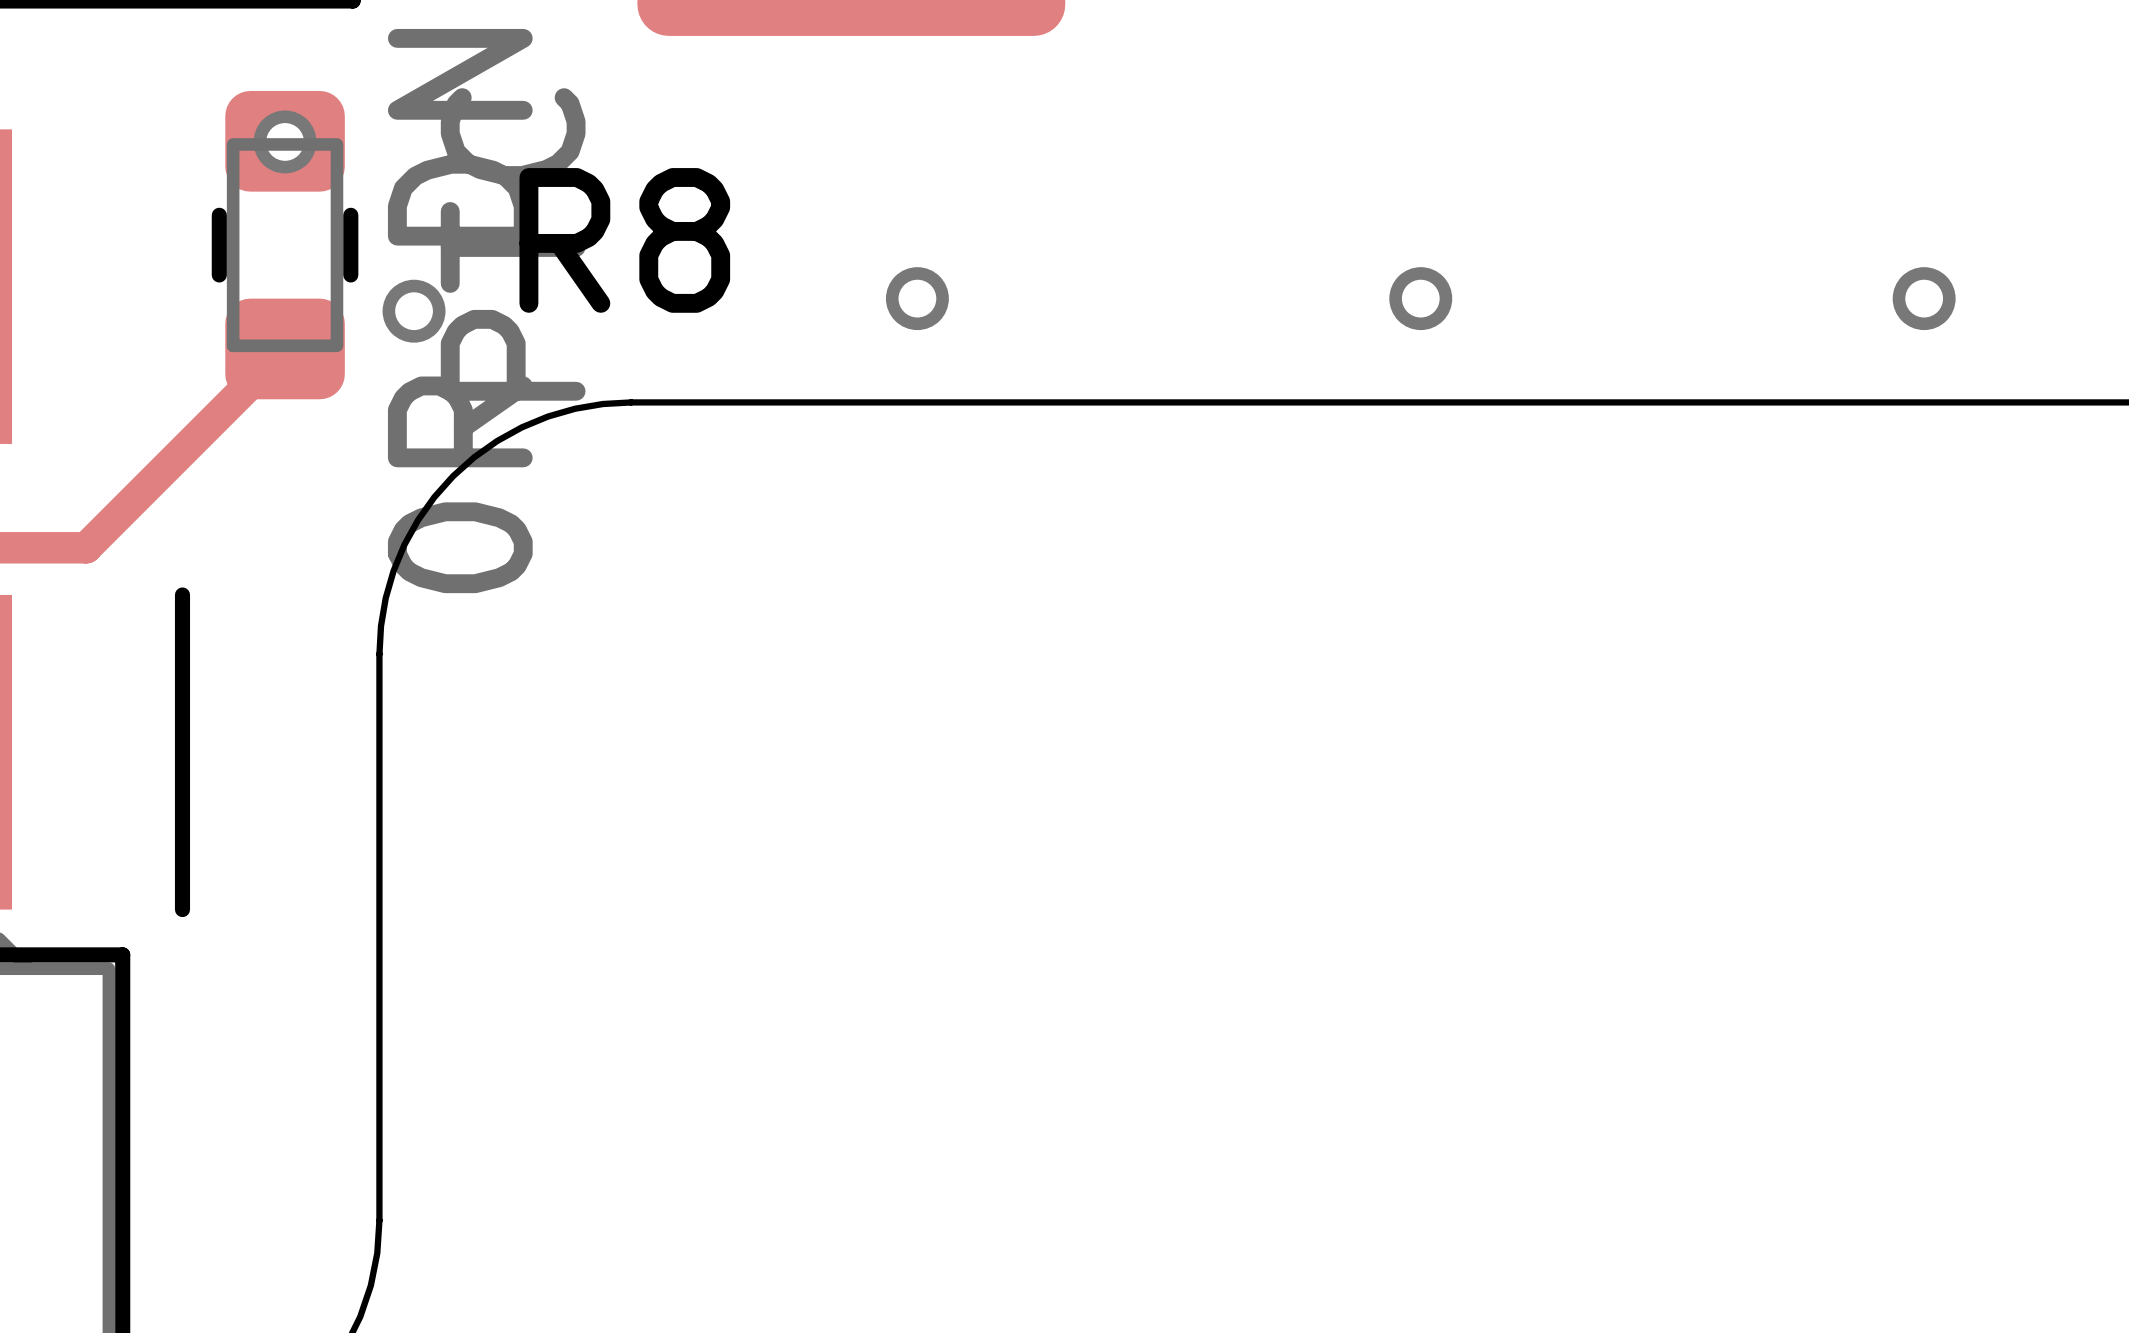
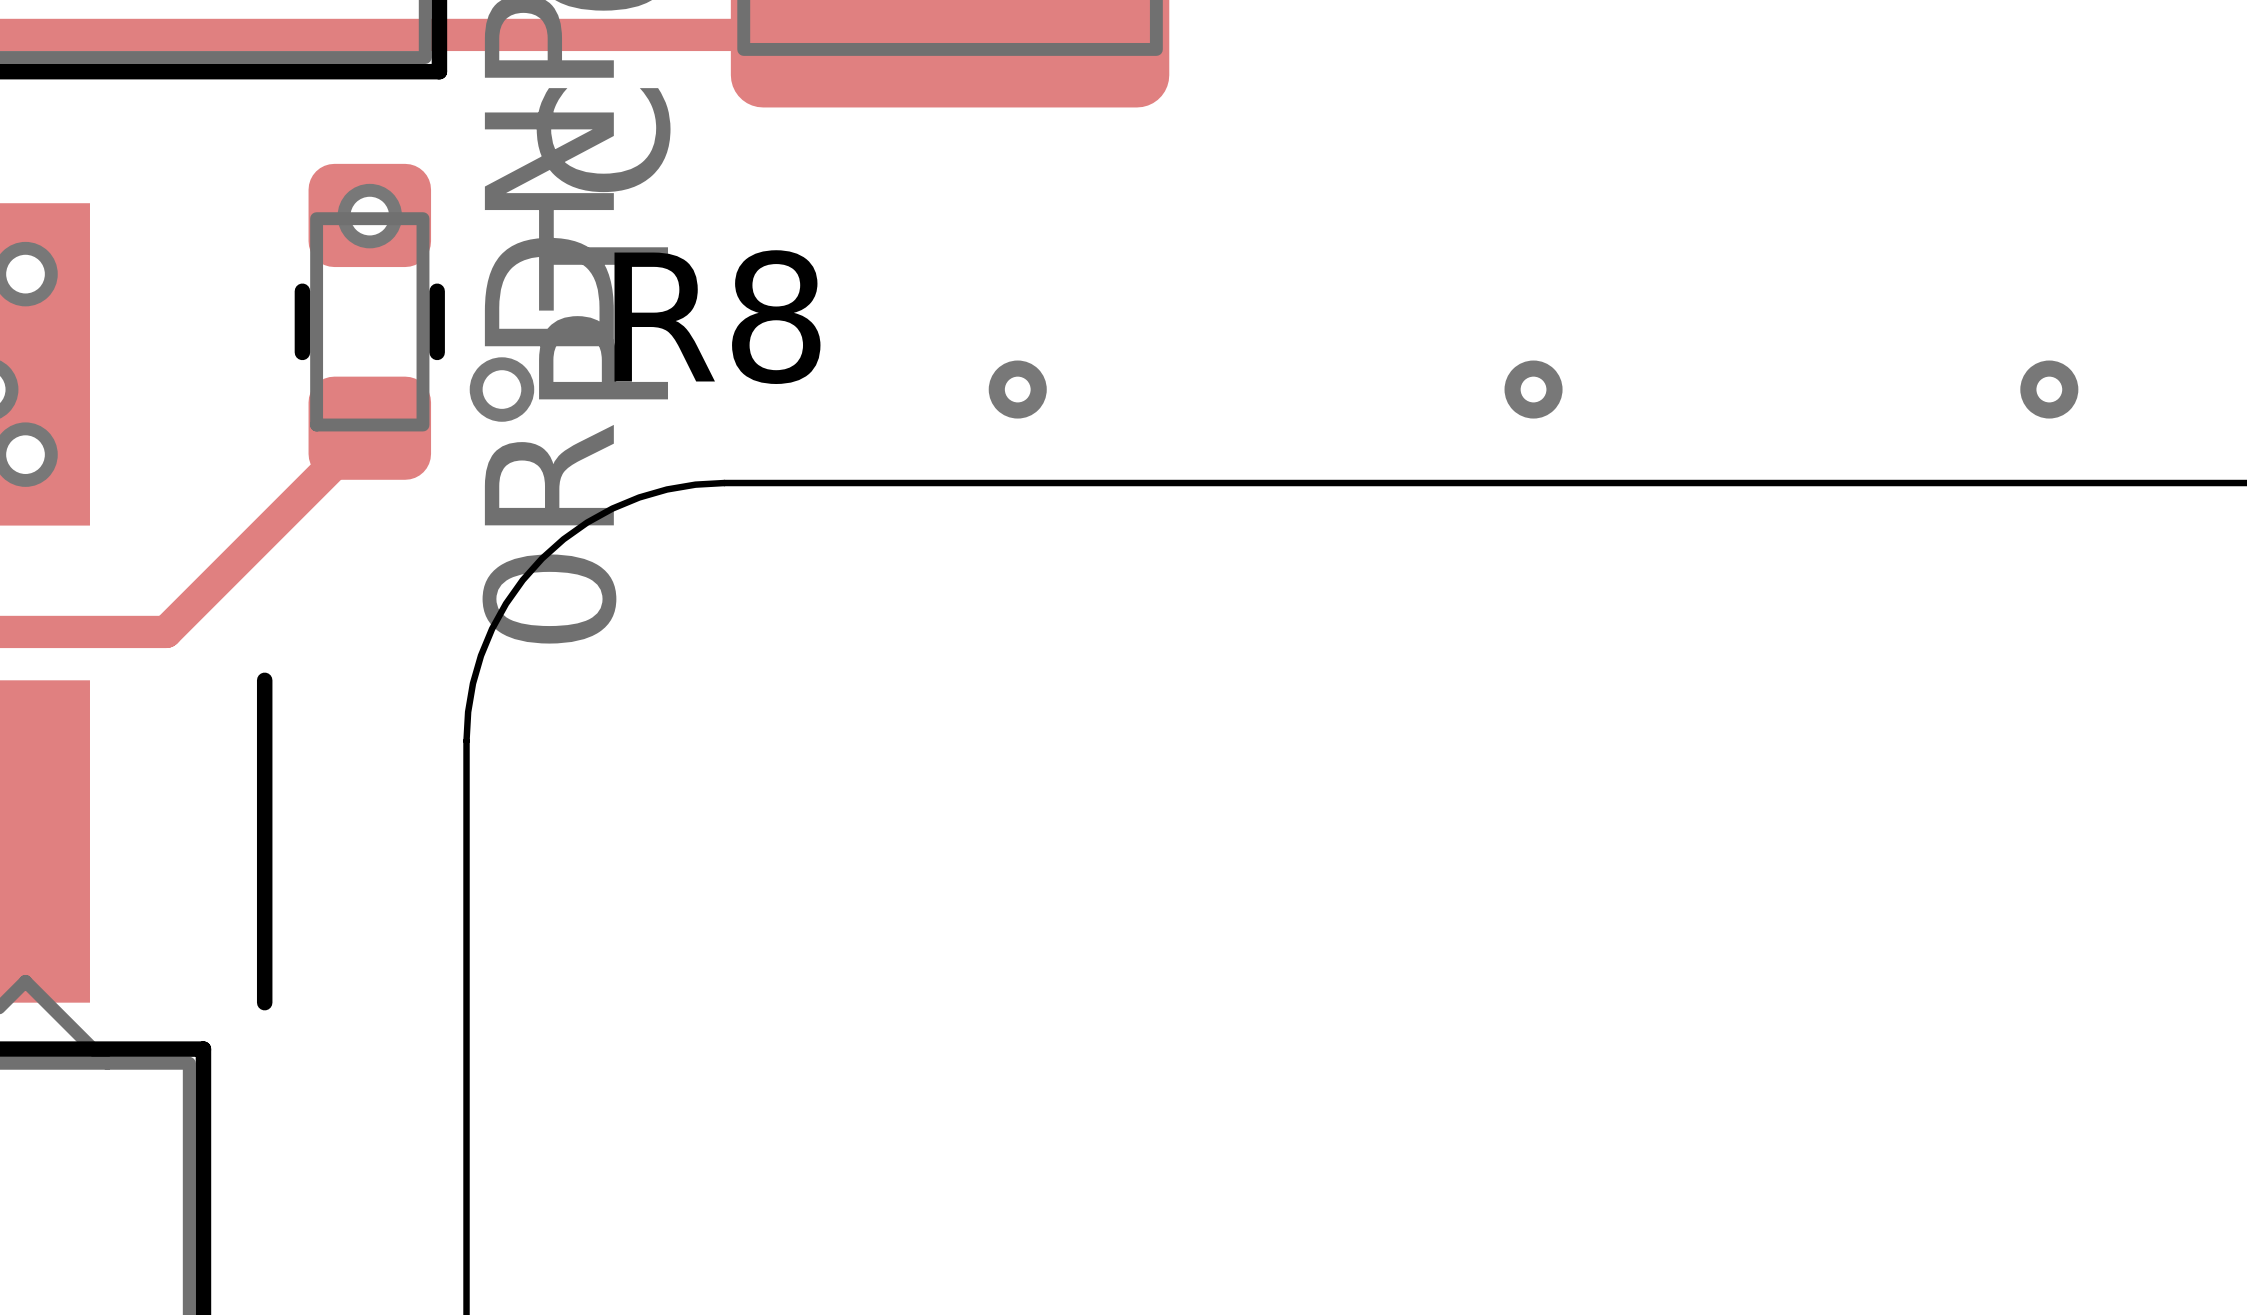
via size: [885, 267, 949, 331] -> [988, 360, 1047, 419]
via size: [1389, 267, 1453, 331] -> [1504, 360, 1563, 419]
via size: [1892, 267, 1956, 331] -> [2020, 360, 2079, 419]

